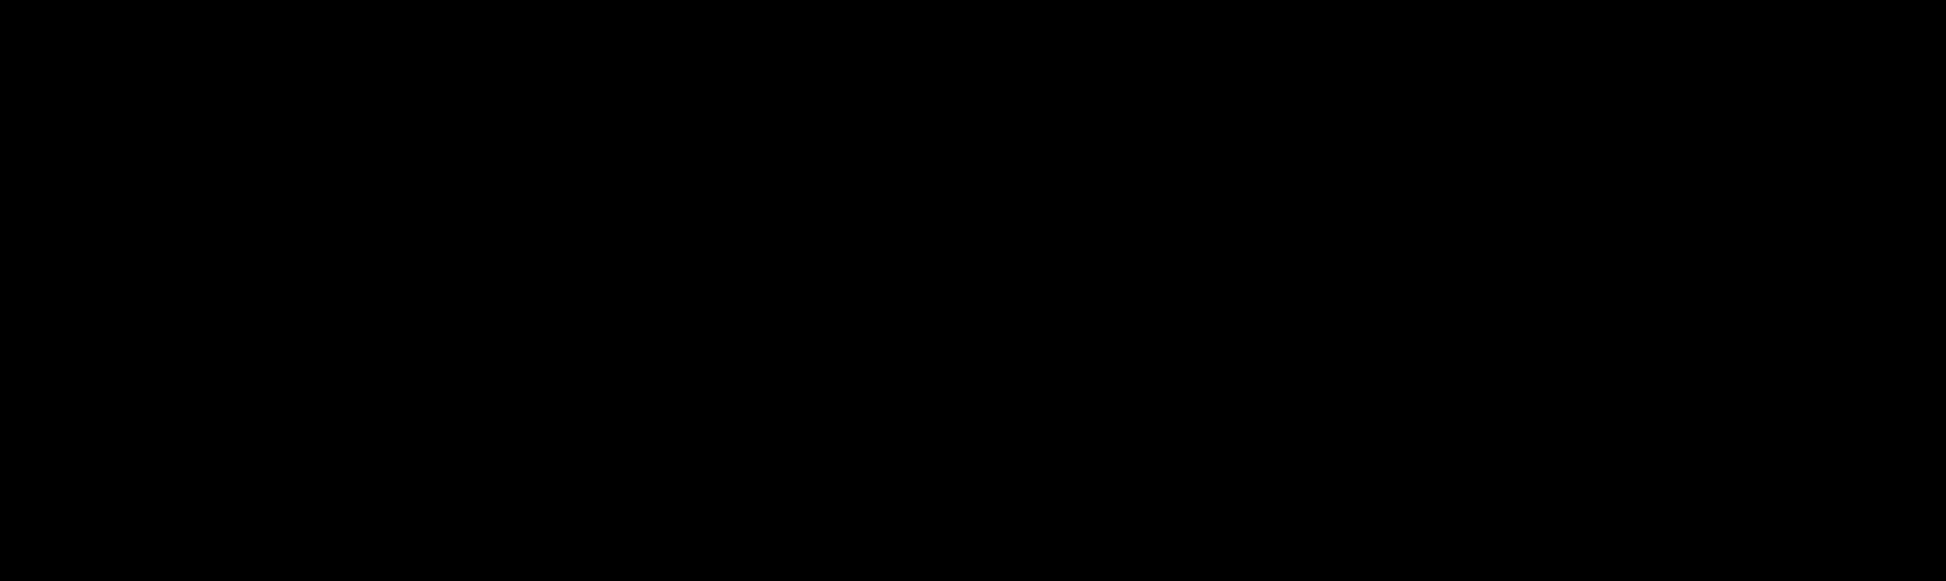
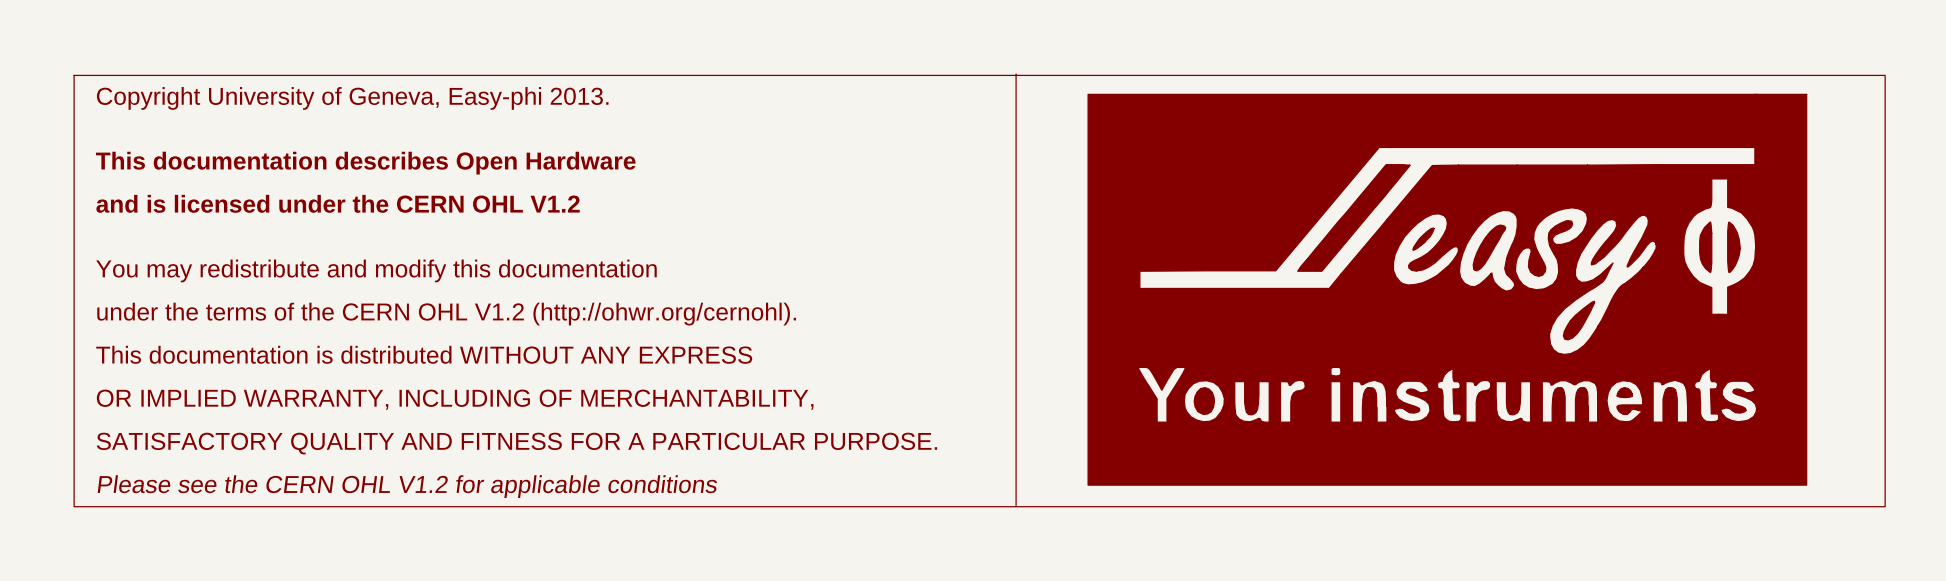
part: none -> (1447, 289)
part: none -> (979, 290)

